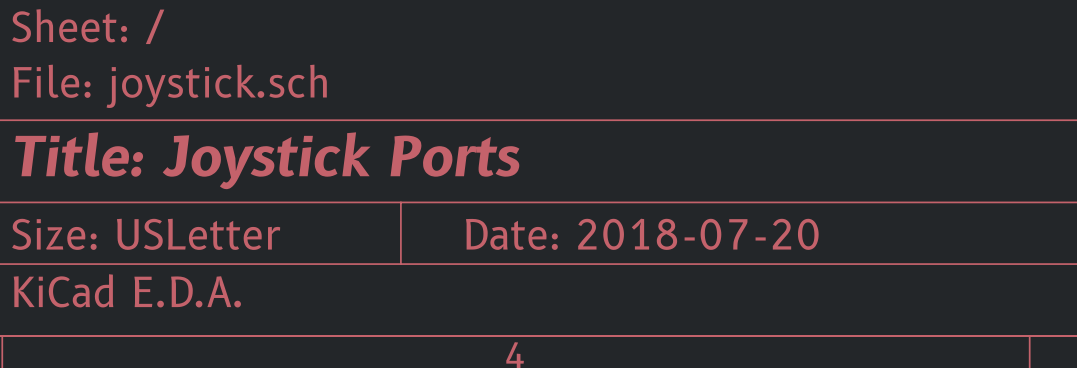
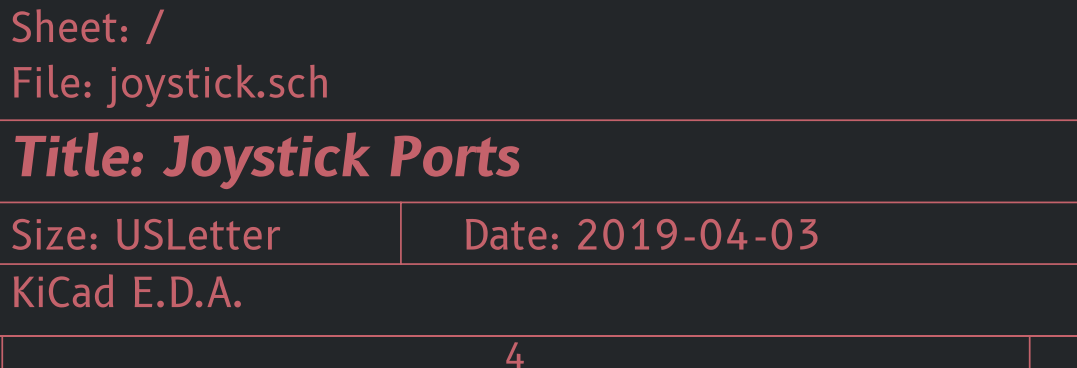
title block: Date: 2018-07-20 (642, 234) -> Date: 2019-04-03 (641, 234)

